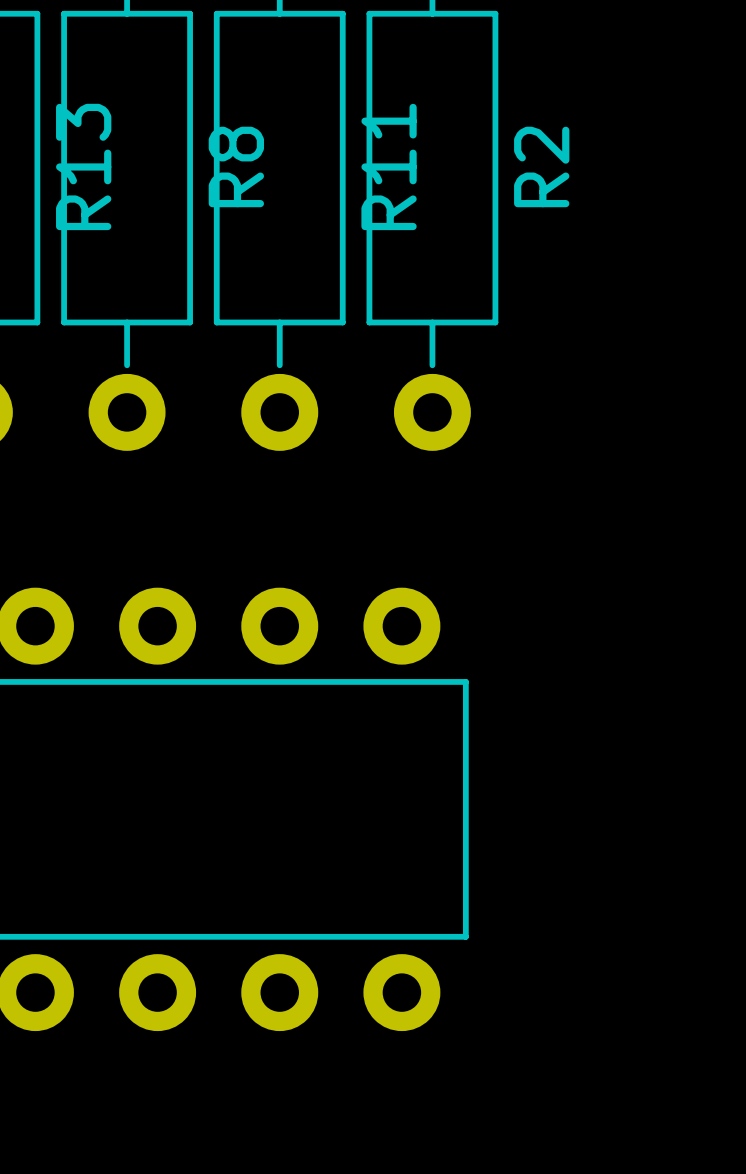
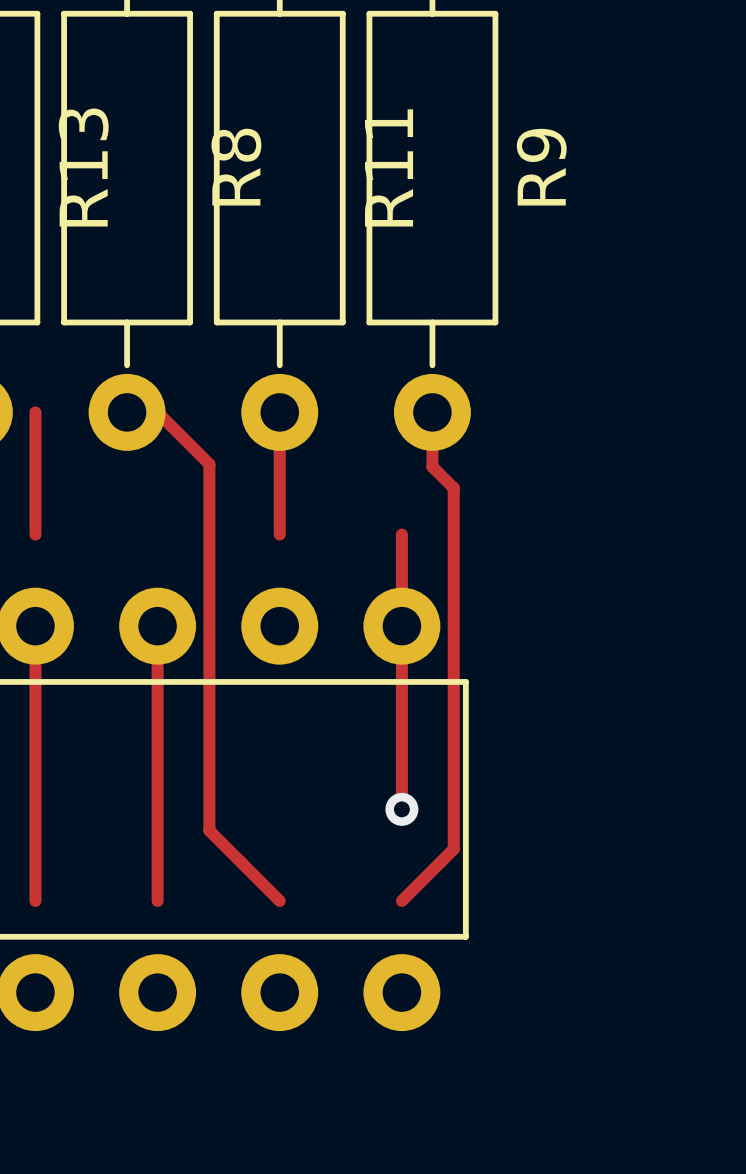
R2 name: R2 (541, 166) -> R9 (541, 167)
top track: none -> (35, 412) (35, 534)
top track: none -> (157, 412) (209, 464) (209, 830) (279, 900)
top track: none -> (279, 412) (279, 534)
top track: none -> (432, 412) (432, 466) (453, 488) (453, 849) (401, 900)
top track: none -> (401, 534) (401, 809)
top track: none -> (157, 626) (157, 900)
top track: none -> (35, 656) (35, 900)
via: none -> (401, 809)

